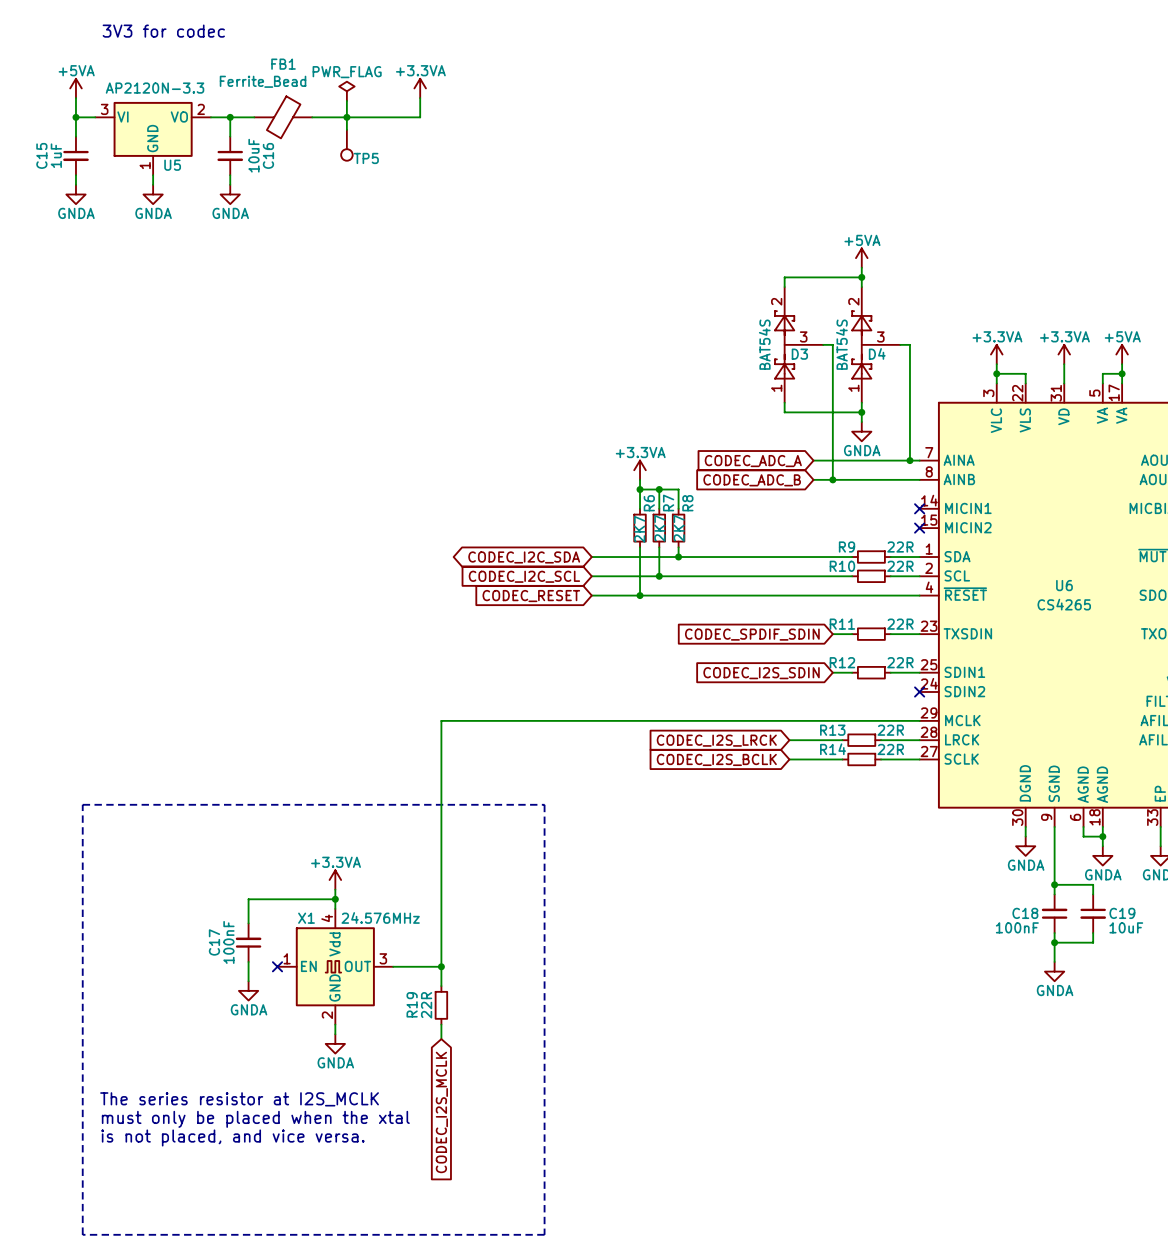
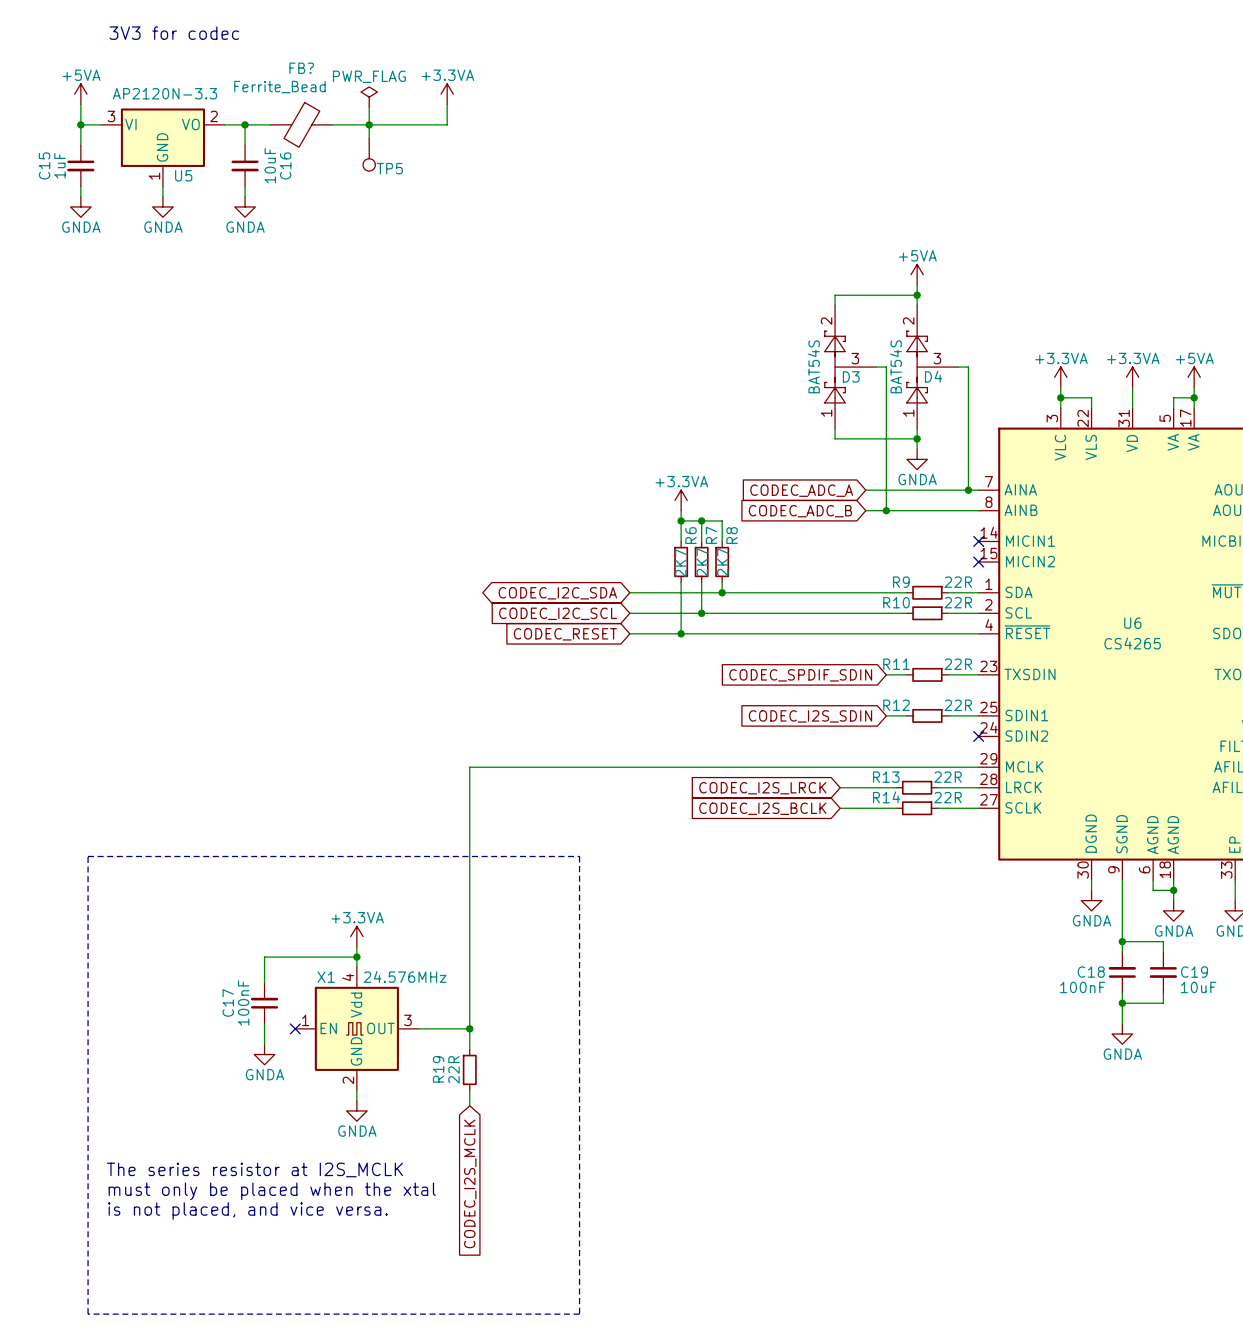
FB1 name: FB1 (283, 64) -> FB? (301, 68)

